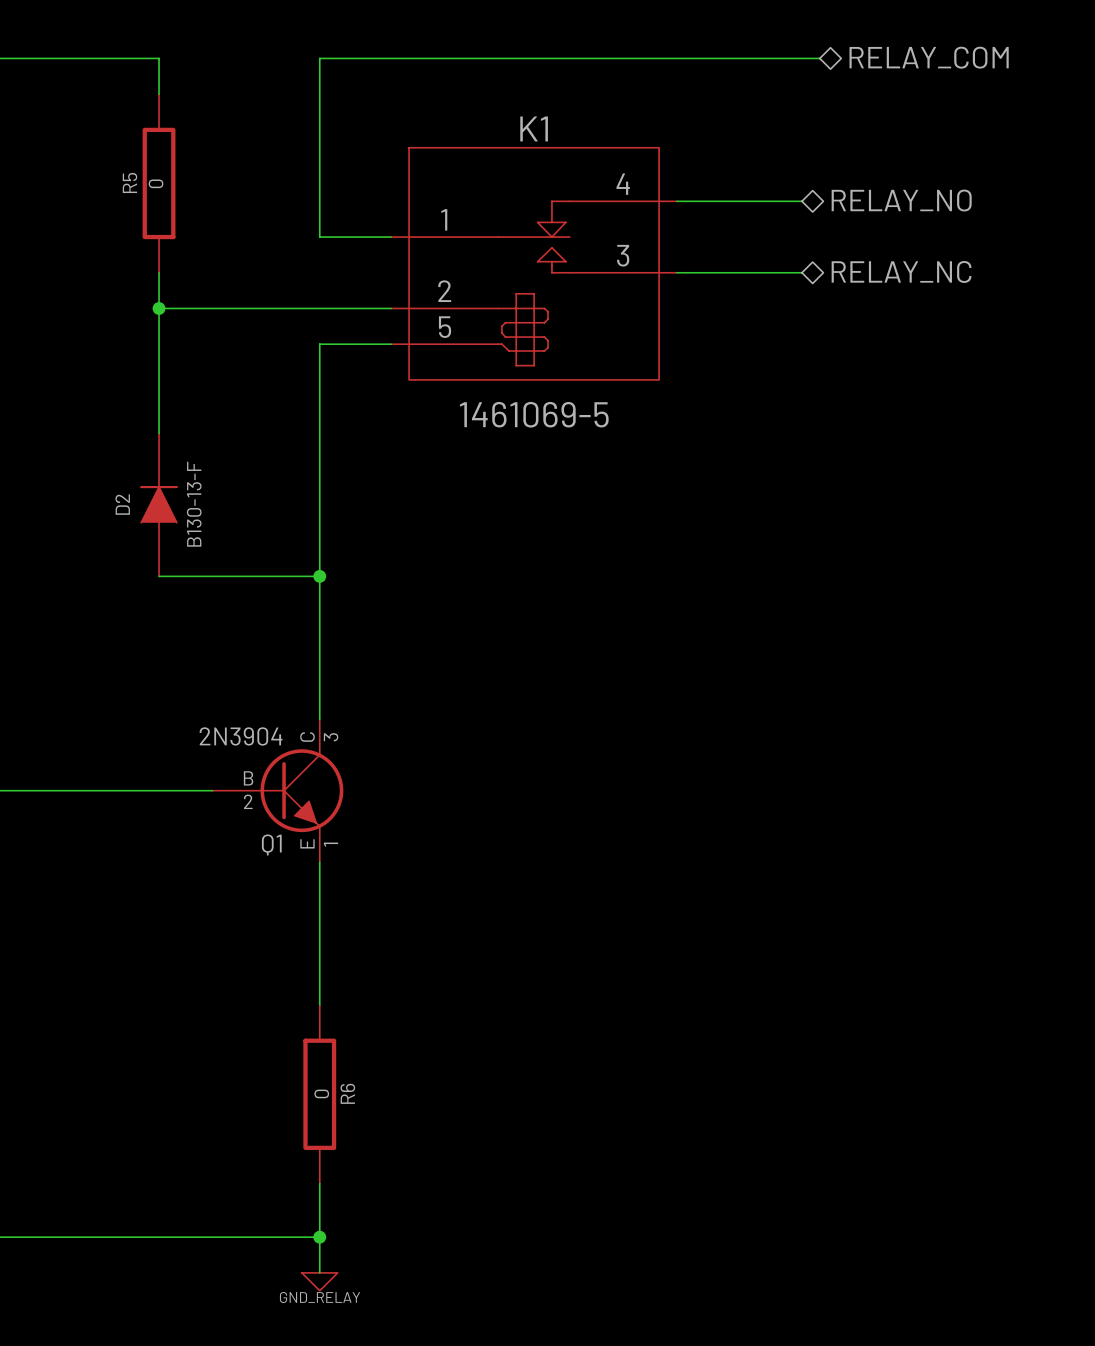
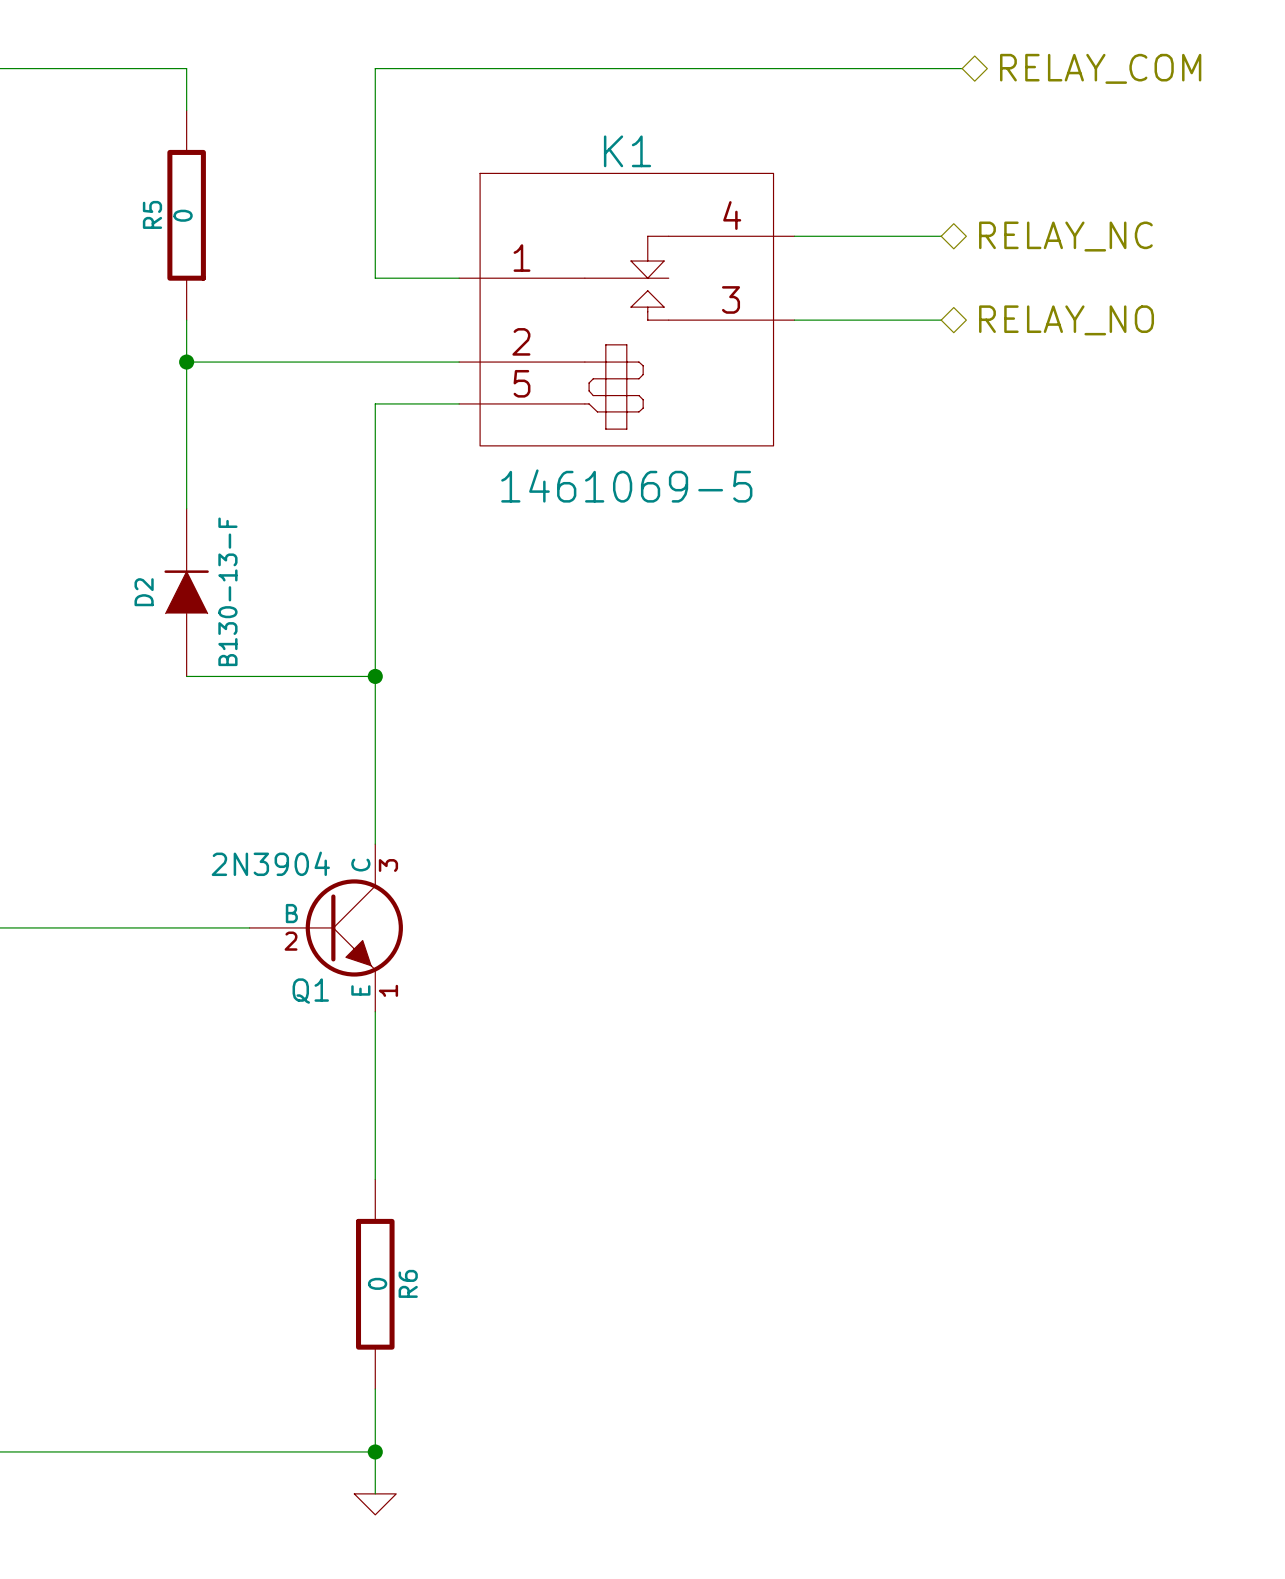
hierarchical label: RELAY_NO (901, 200) -> RELAY_NC (1065, 236)
hierarchical label: RELAY_NC (901, 271) -> RELAY_NO (1066, 320)
power symbol text: GND_RELAY (320, 1297) -> none

